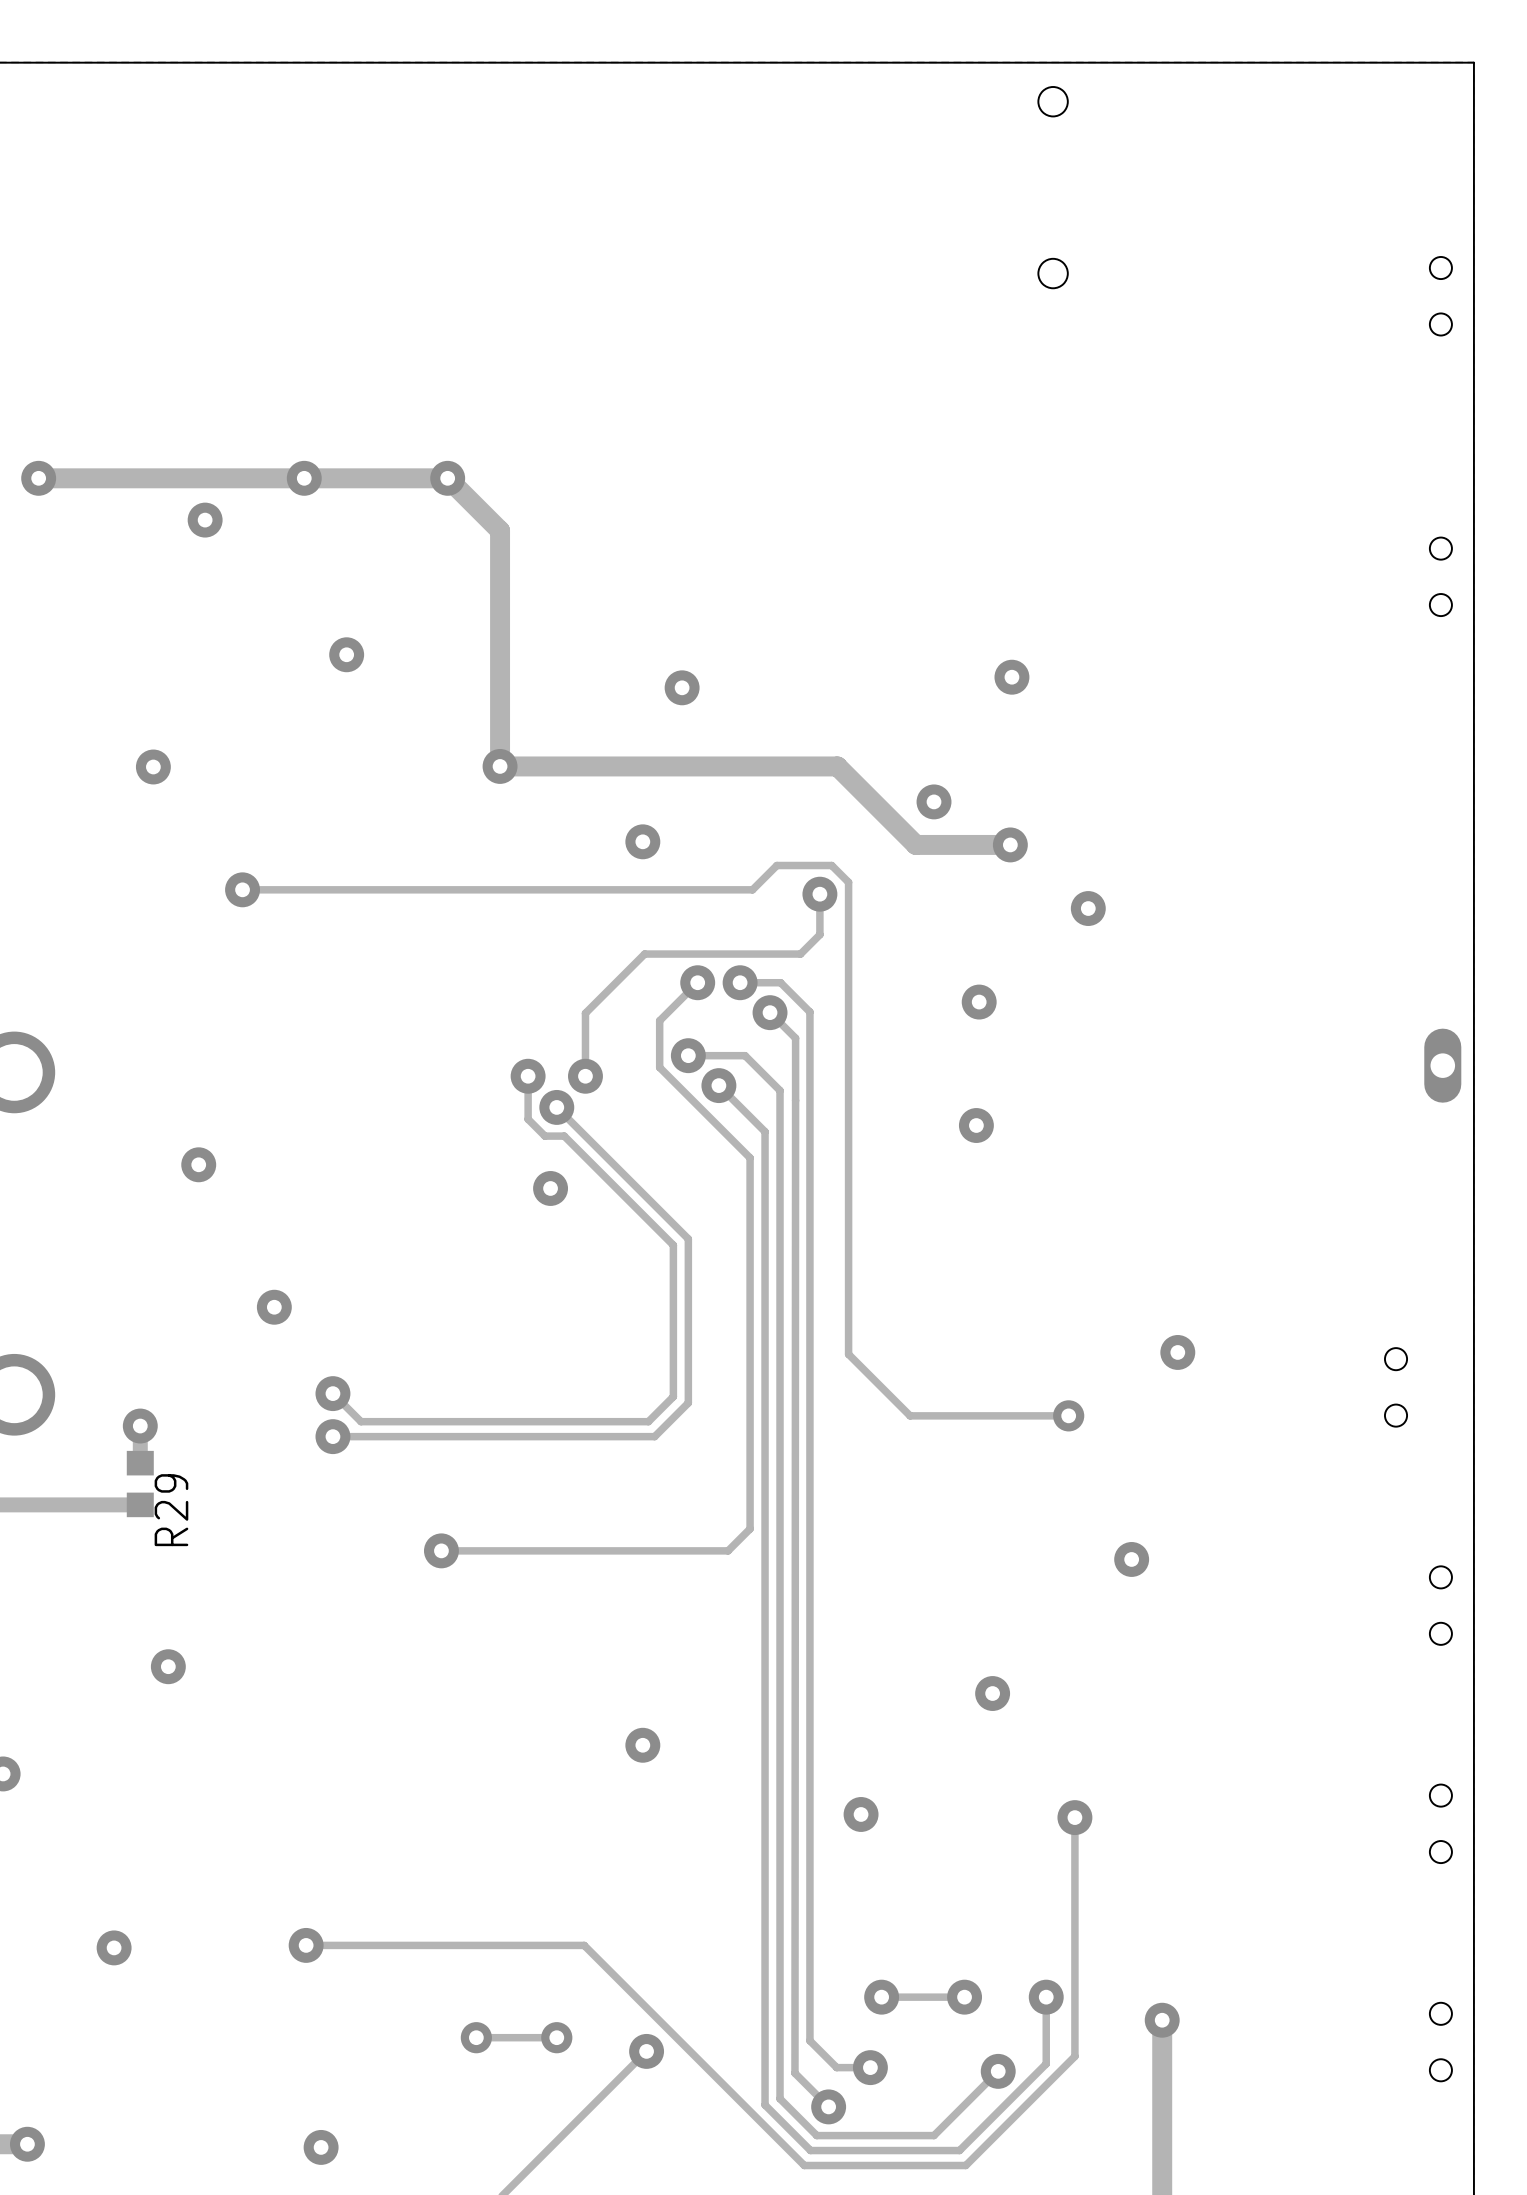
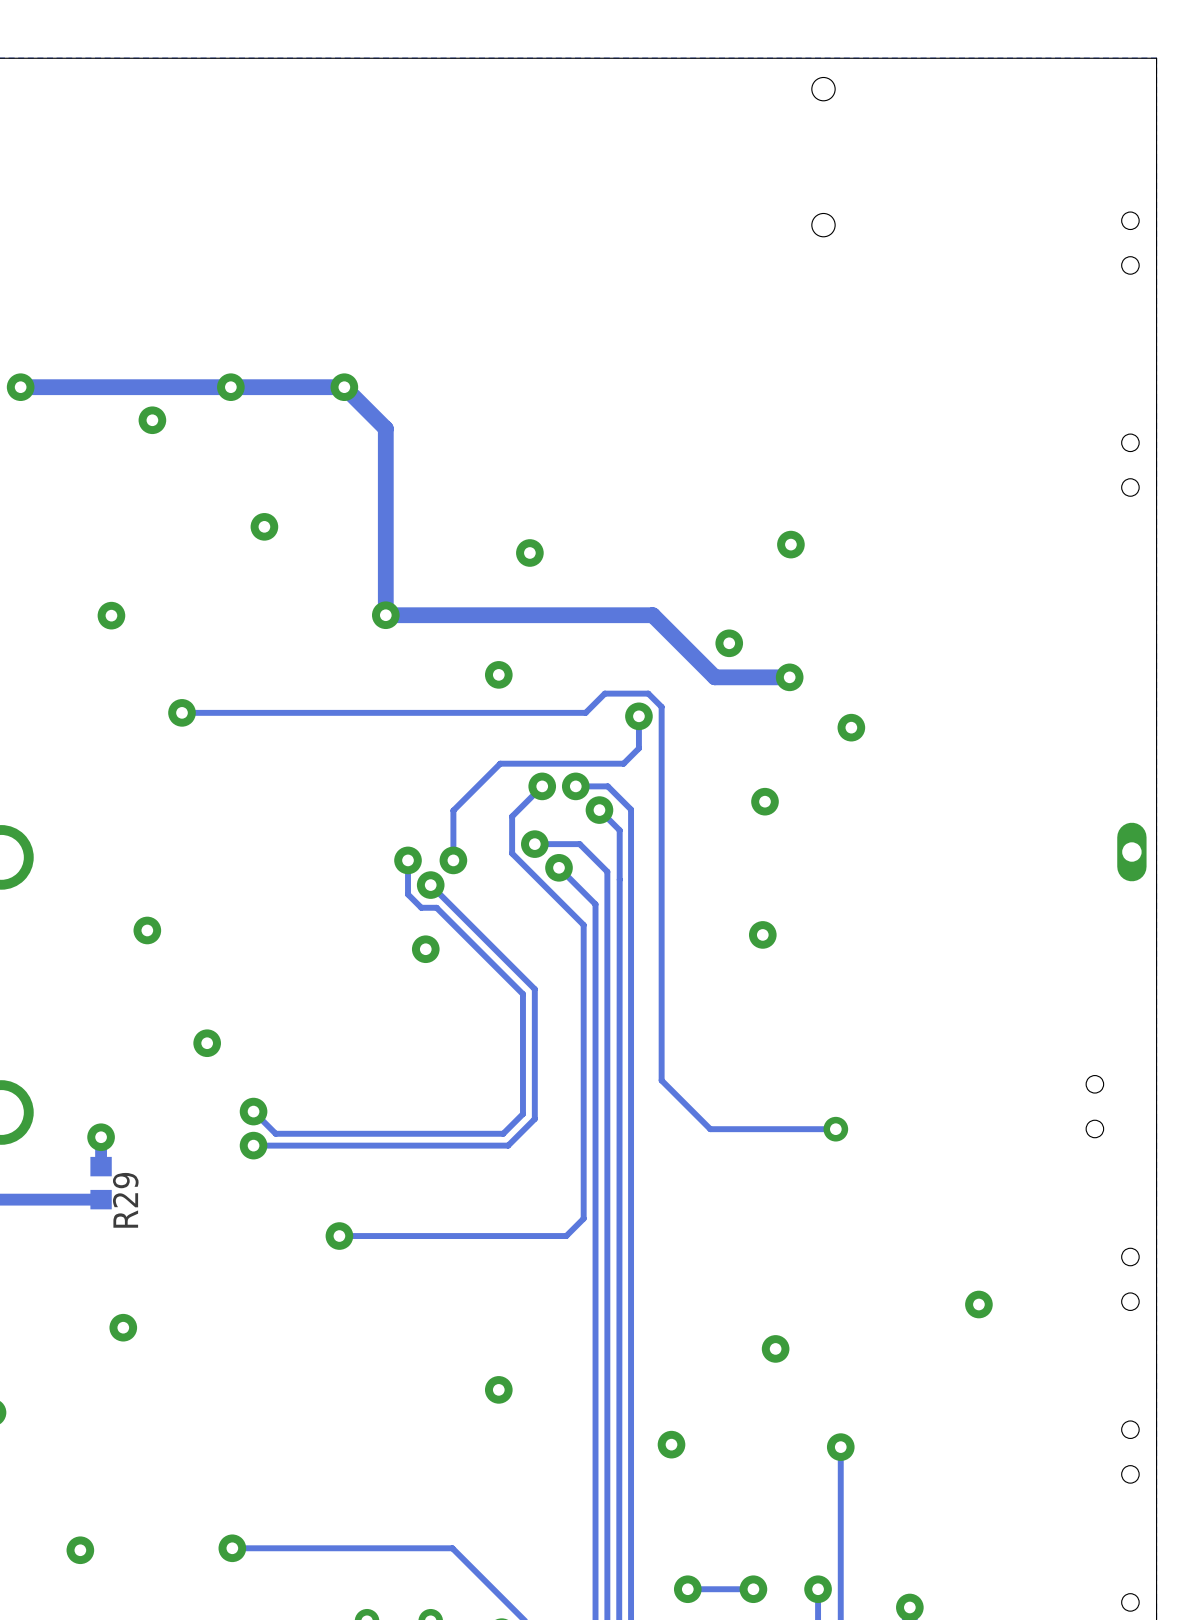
via position: (976, 1125) -> (762, 934)
via: (1177, 1352) -> none
via position: (1131, 1559) -> (978, 1304)

